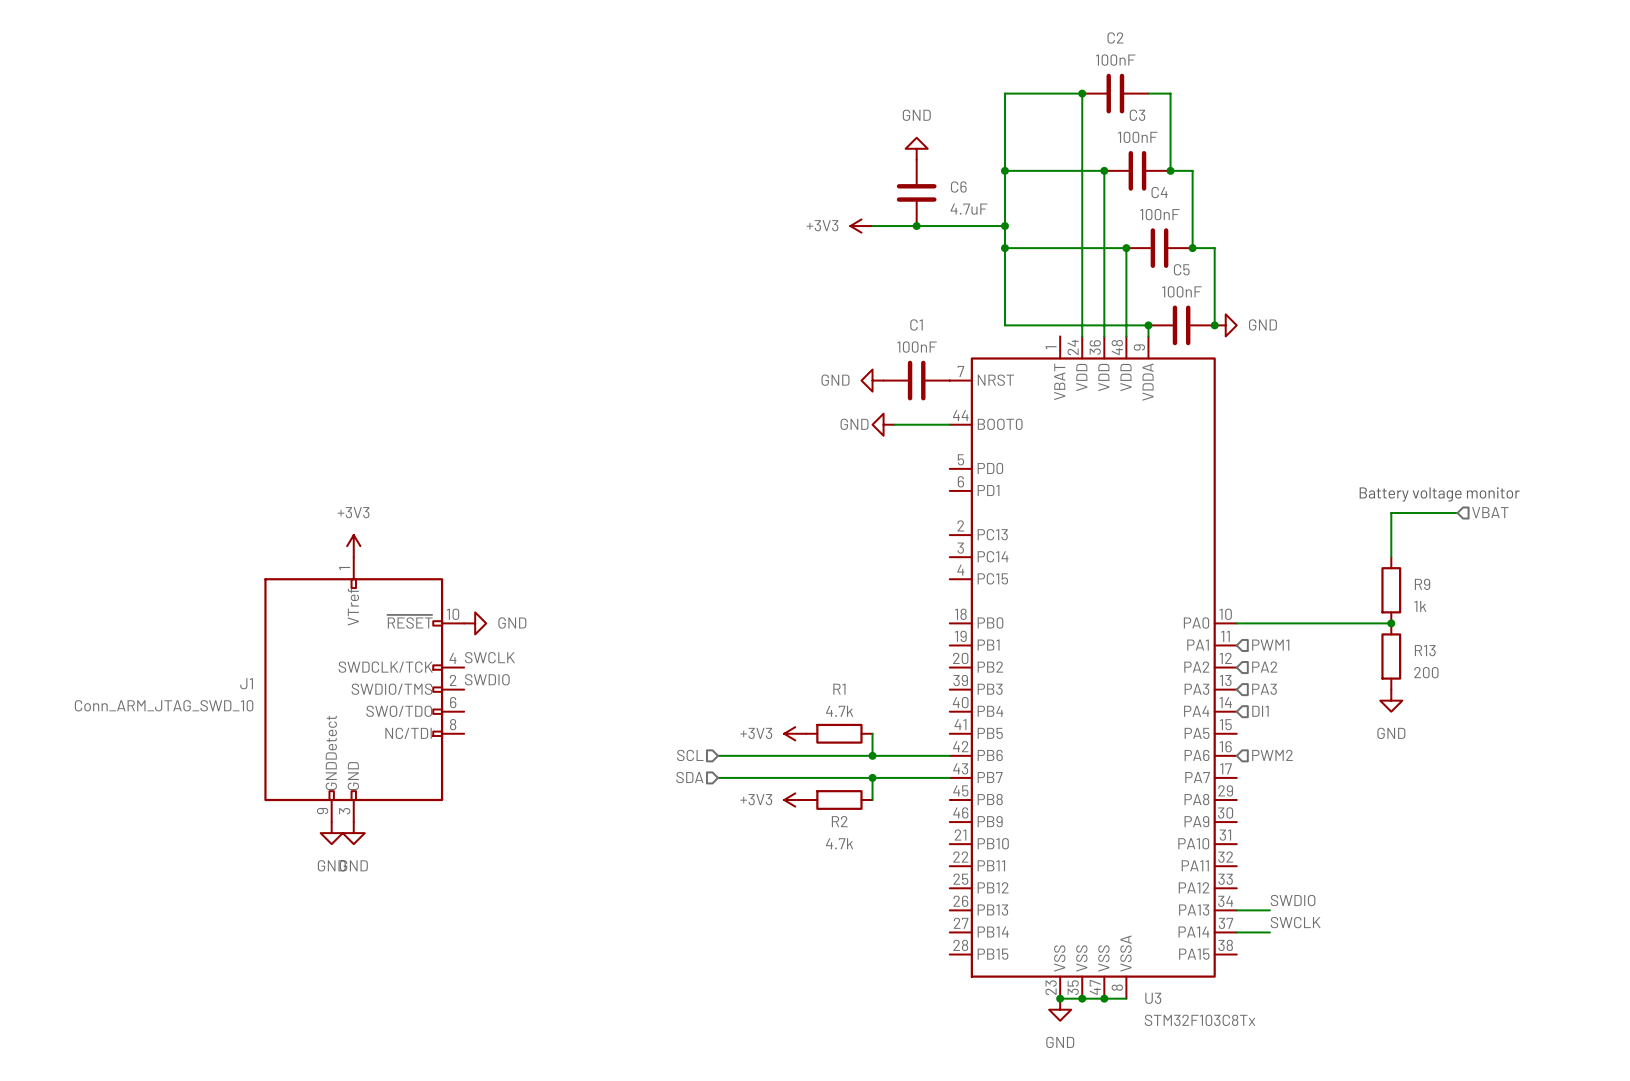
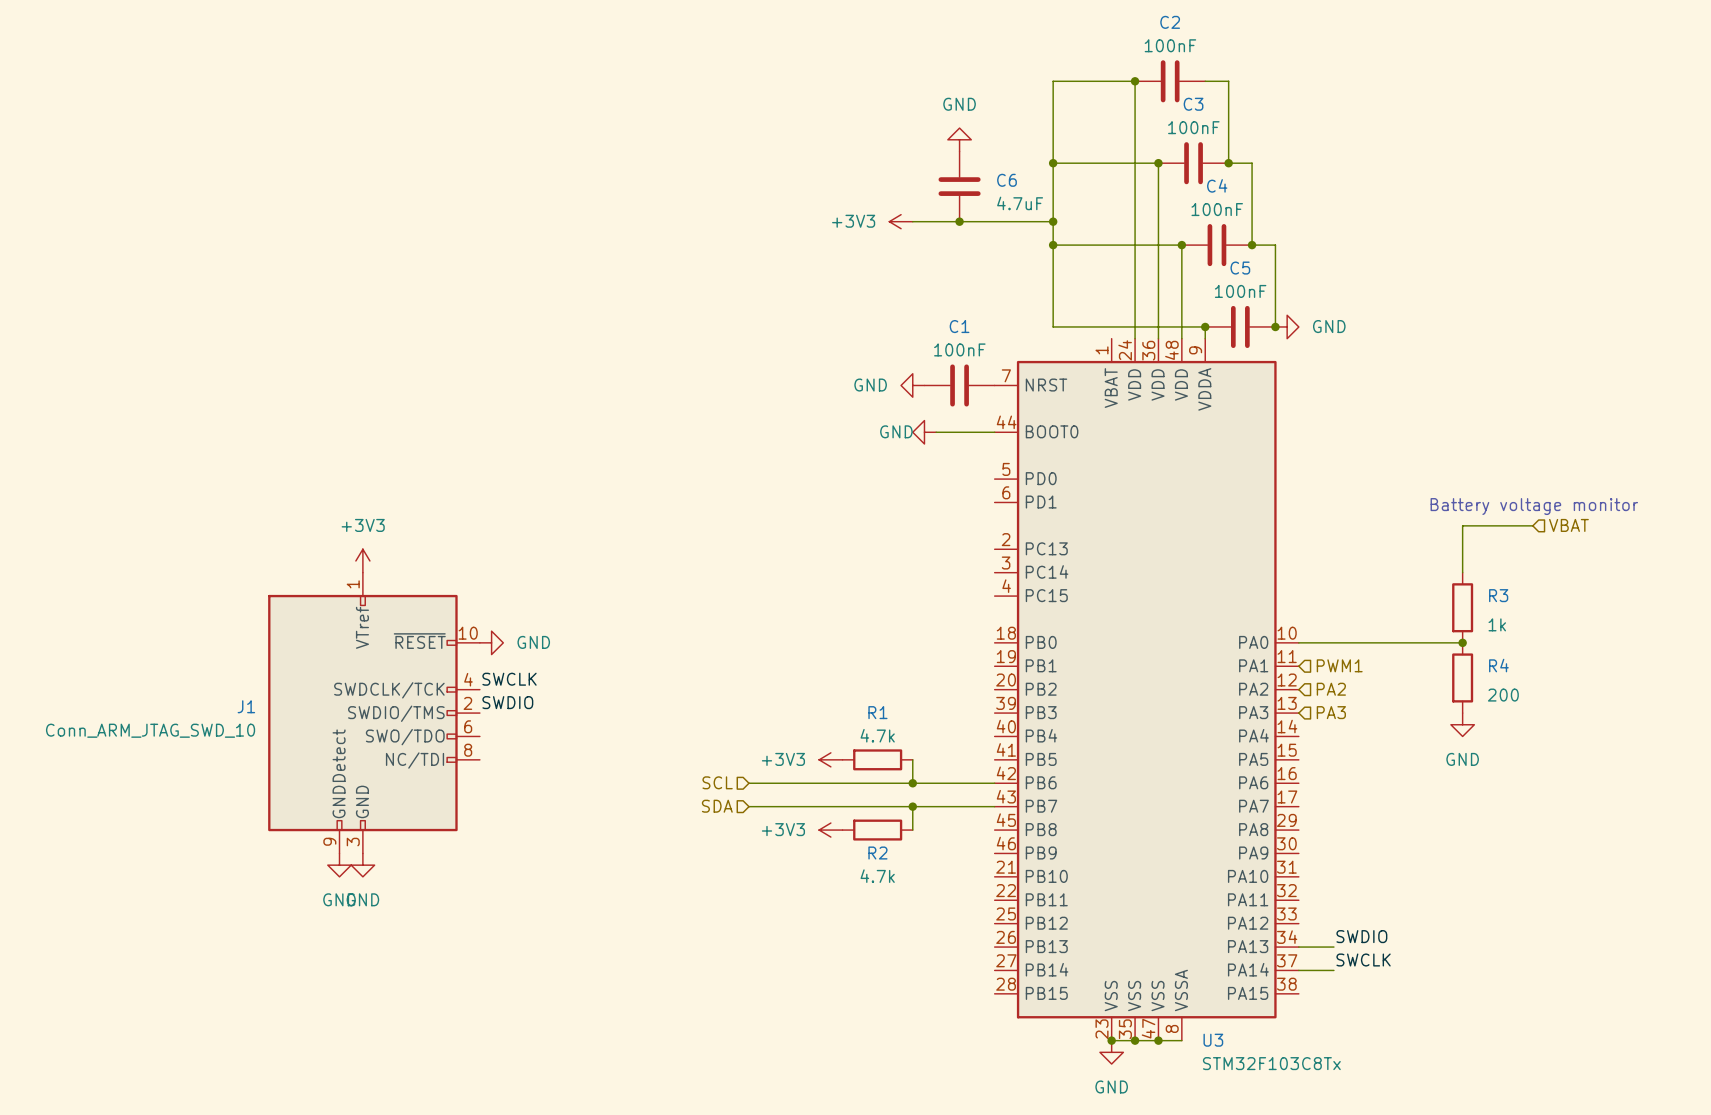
R9 name: R9 (1422, 584) -> R3 (1498, 595)
R13 name: R13 (1425, 650) -> R4 (1498, 665)
hierarchical label: DI1 (1260, 711) -> none
hierarchical label: PWM2 (1272, 755) -> none

